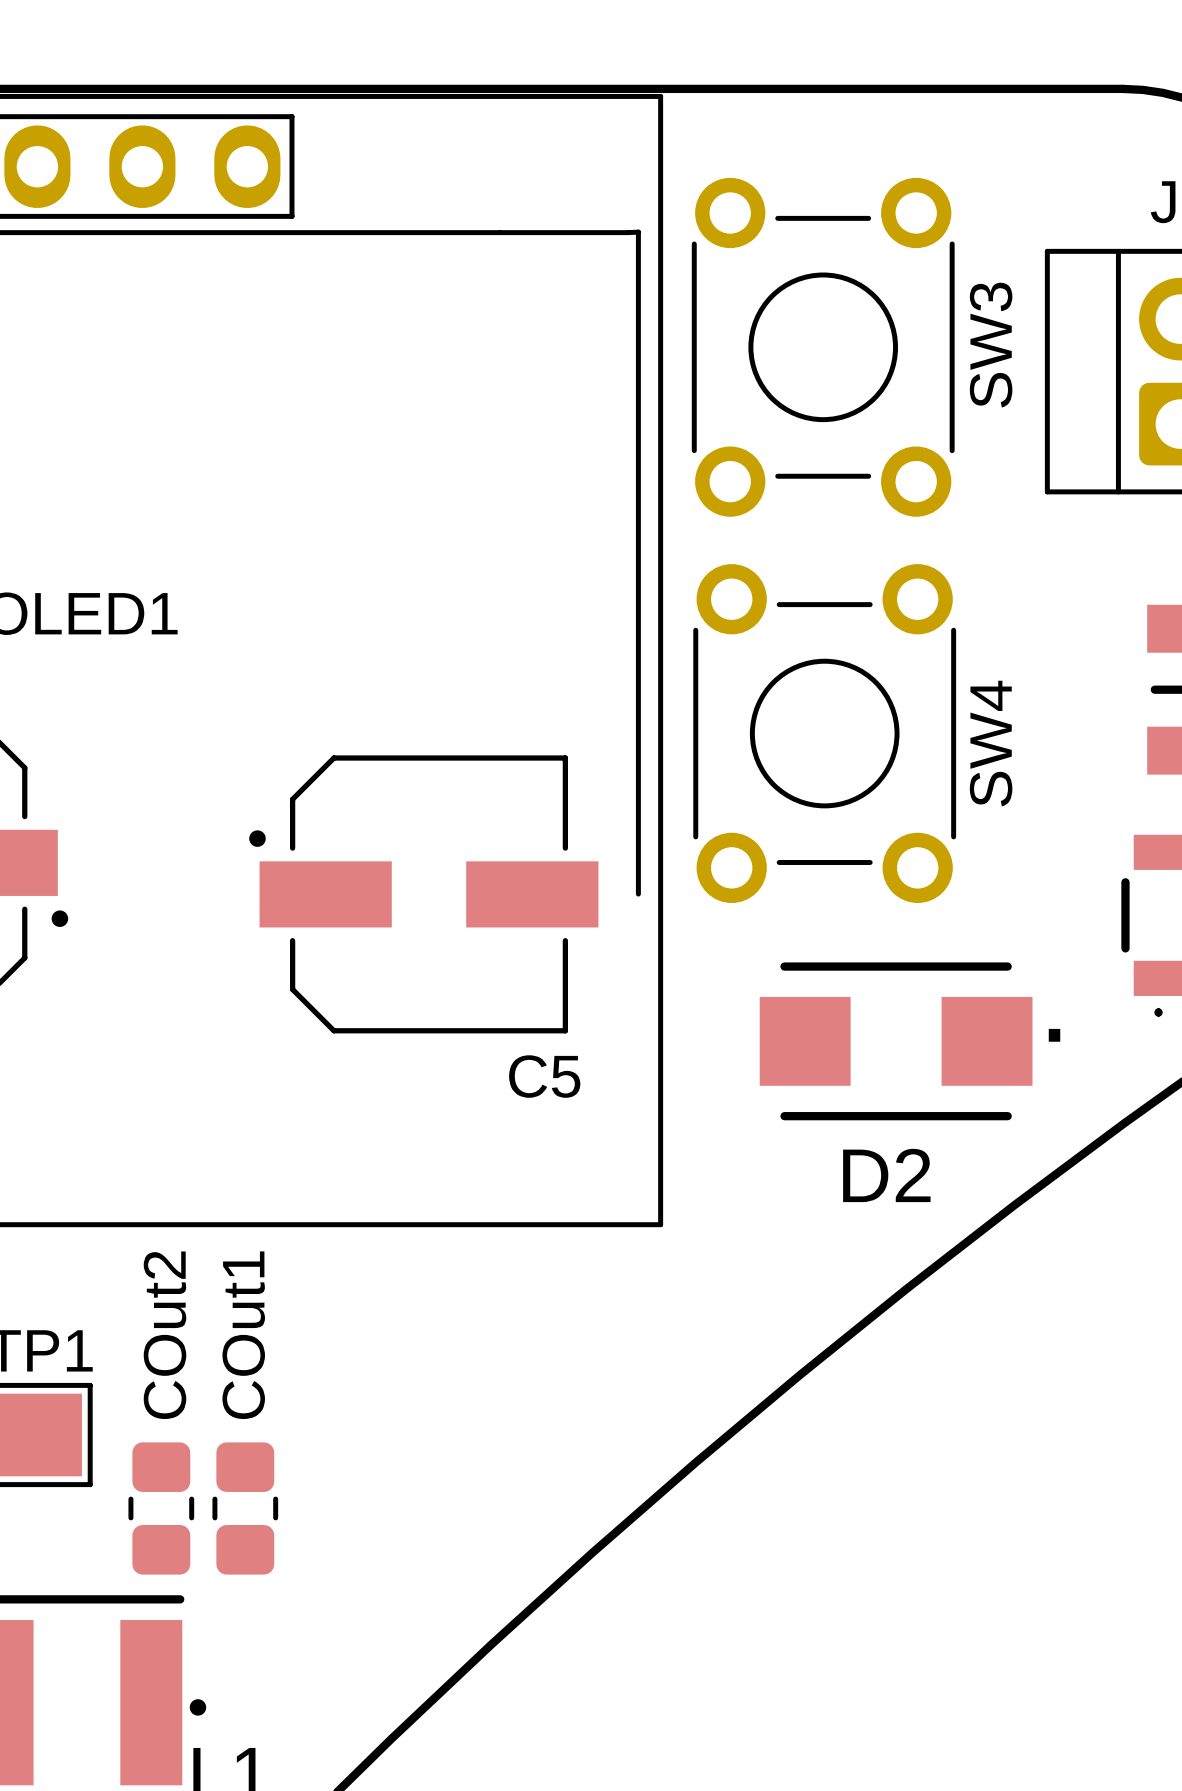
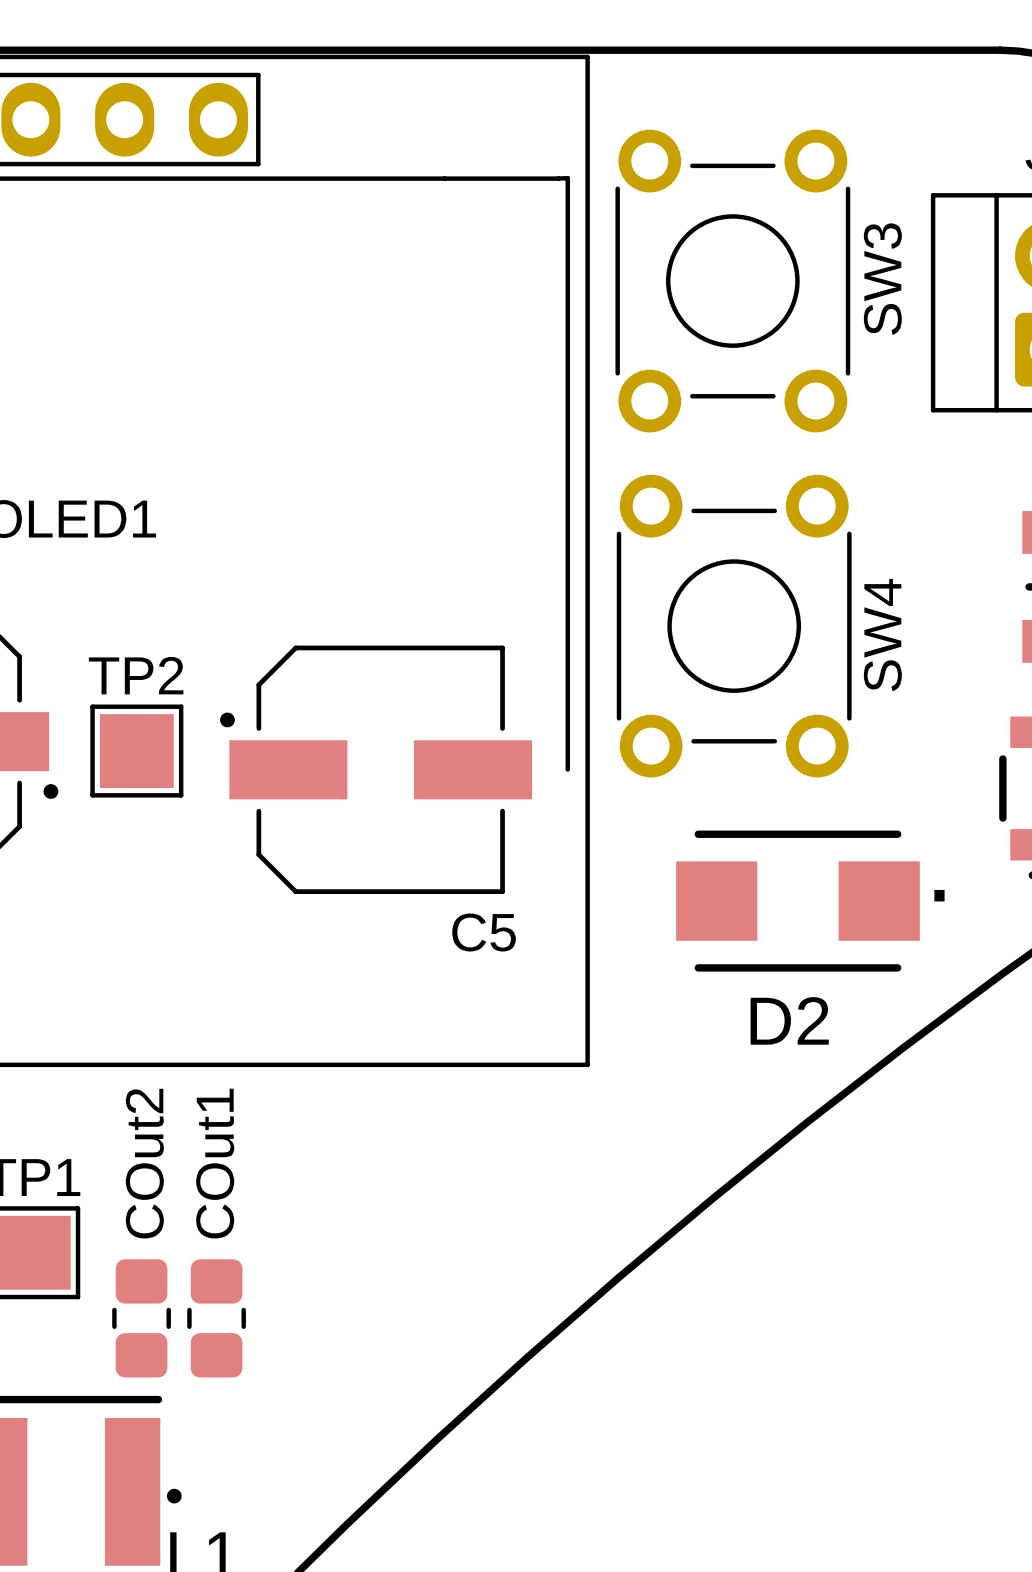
TP2: none -> (136, 751)

